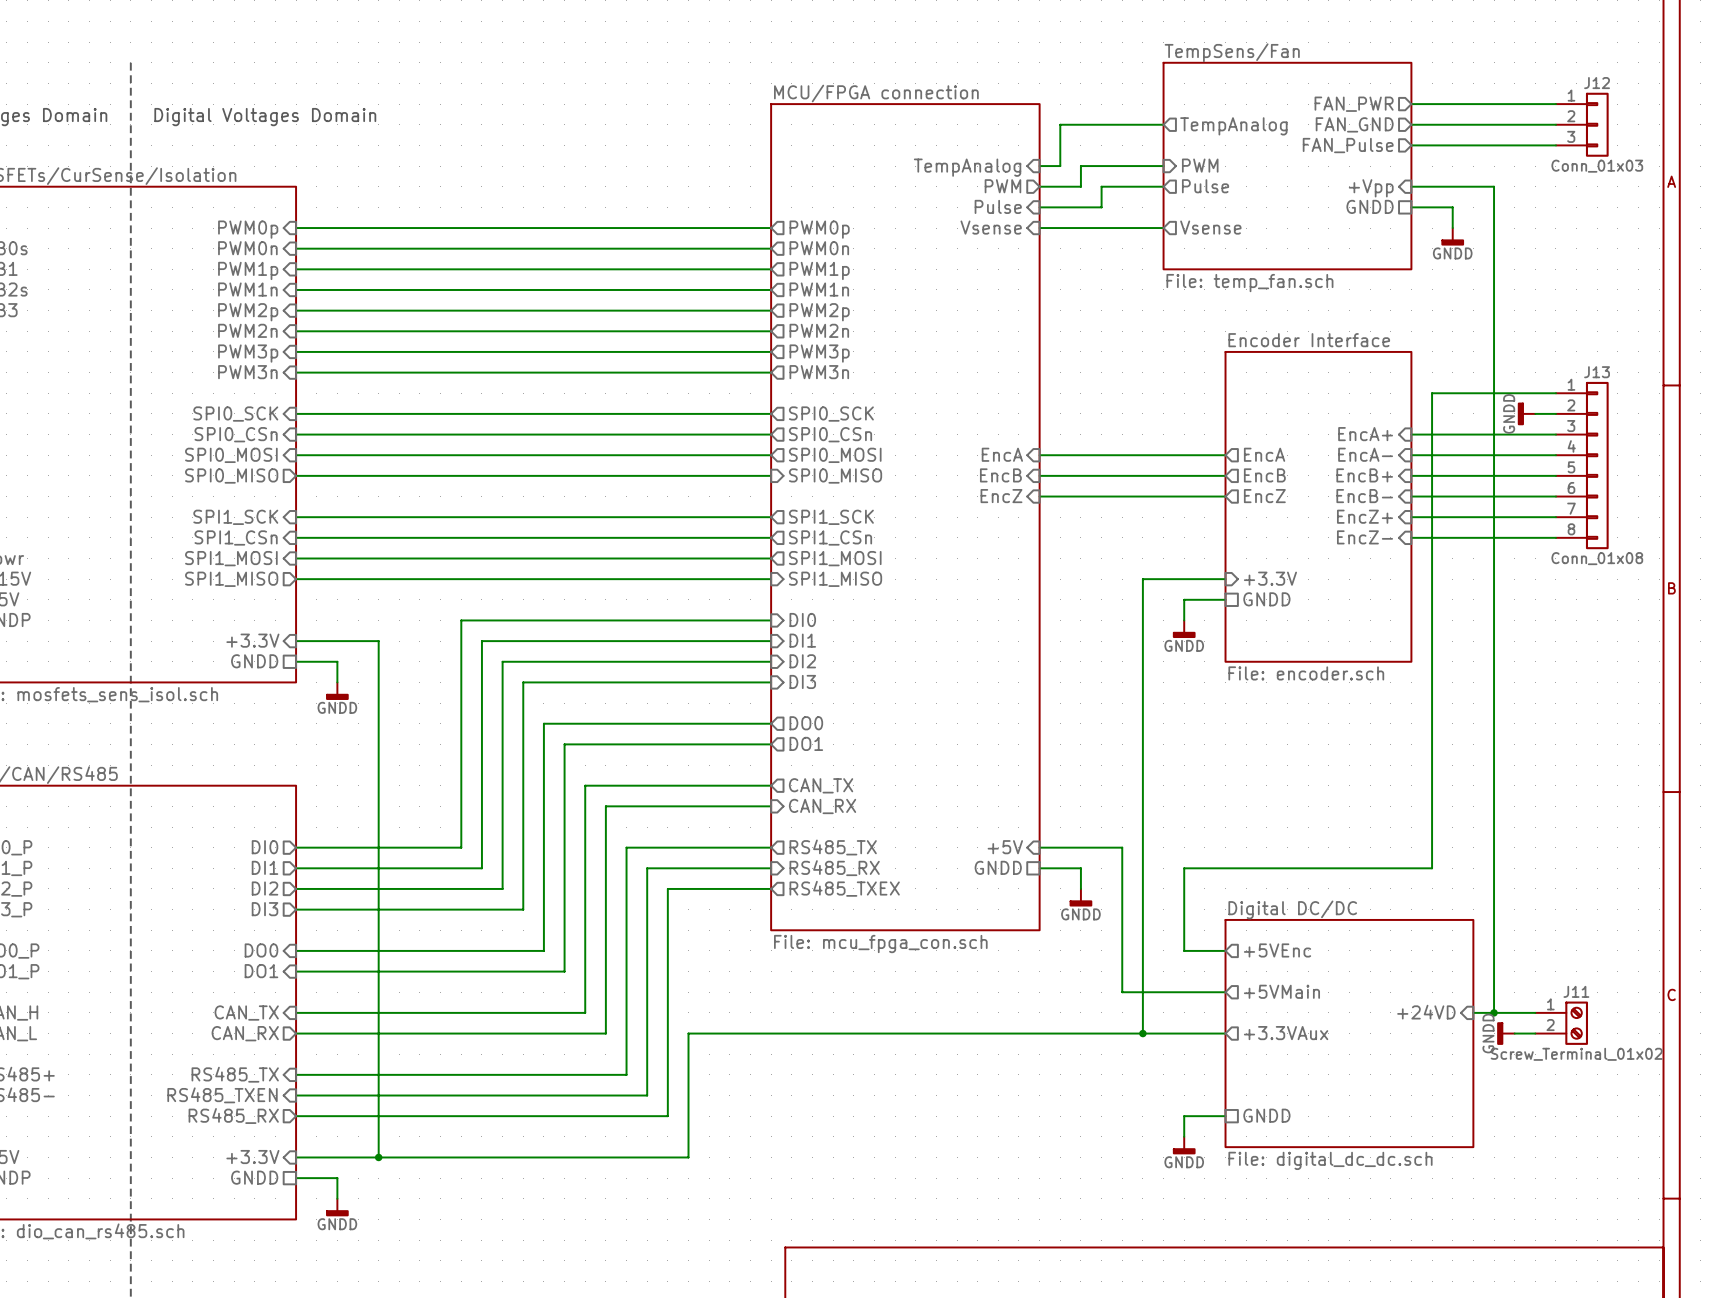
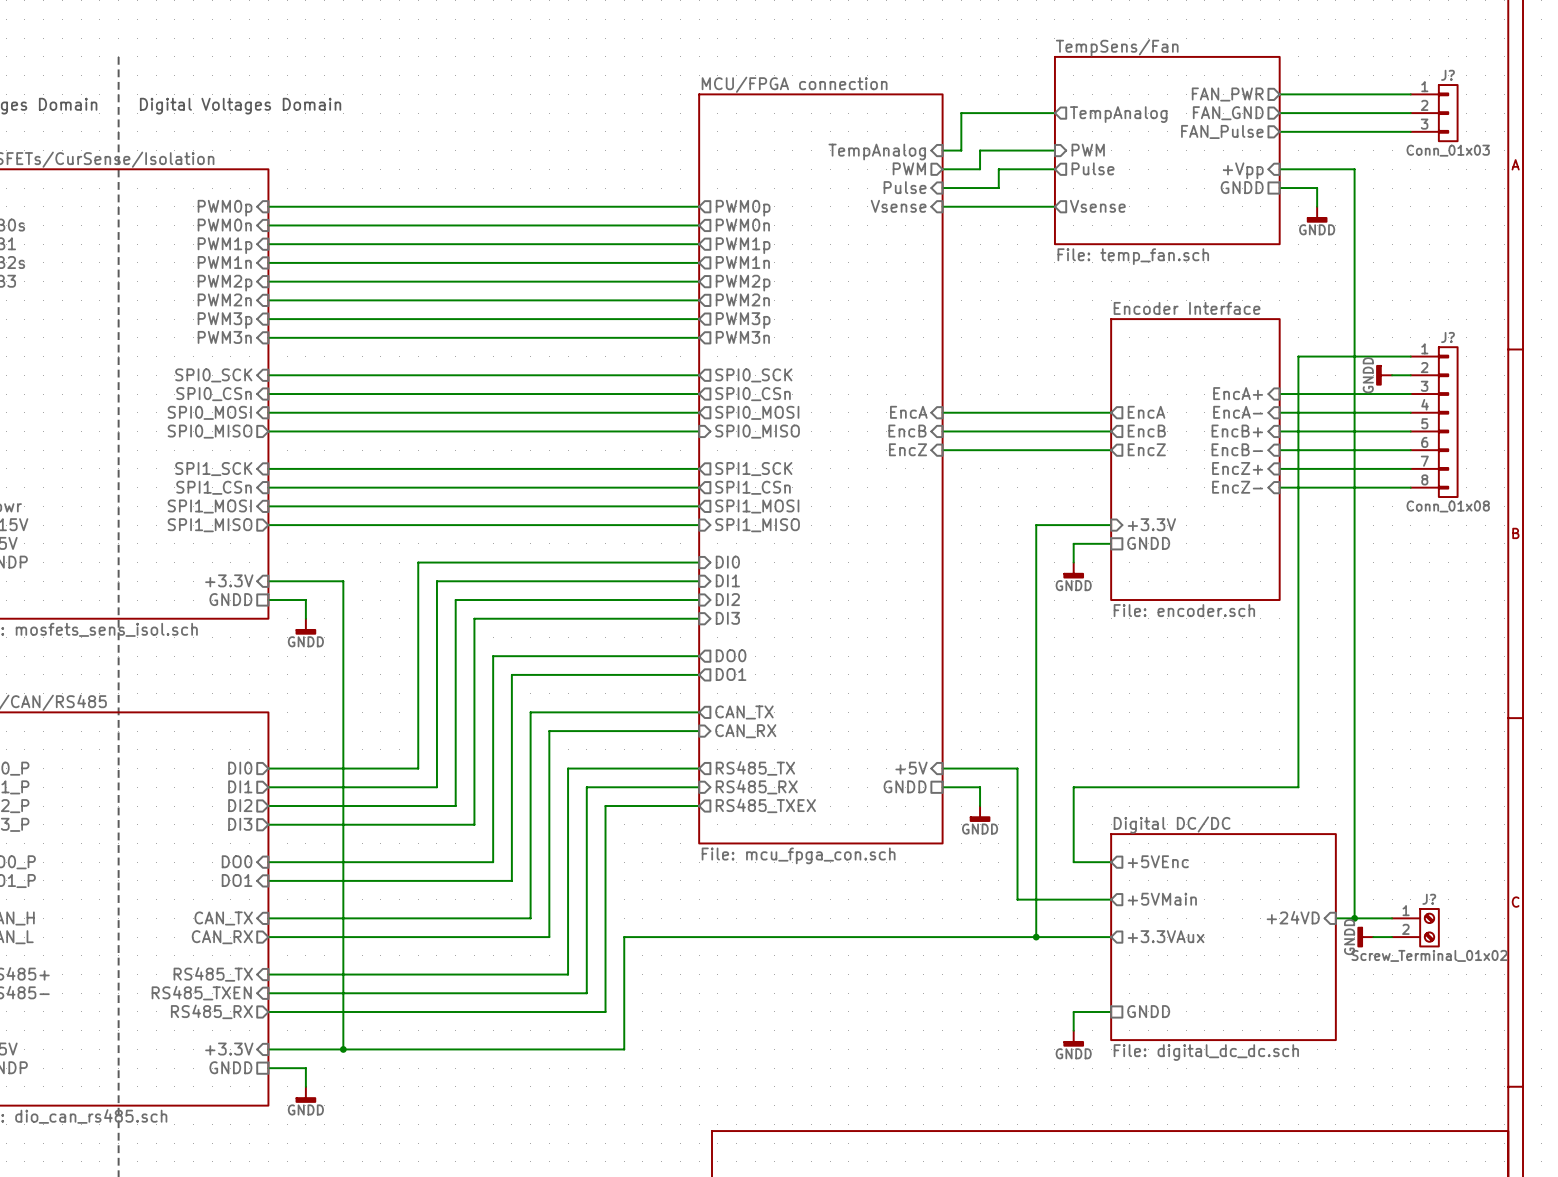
J12 name: J12 (1597, 83) -> J? (1448, 75)
J13 name: J13 (1597, 372) -> J? (1448, 337)
J11 name: J11 (1576, 991) -> J? (1429, 899)

